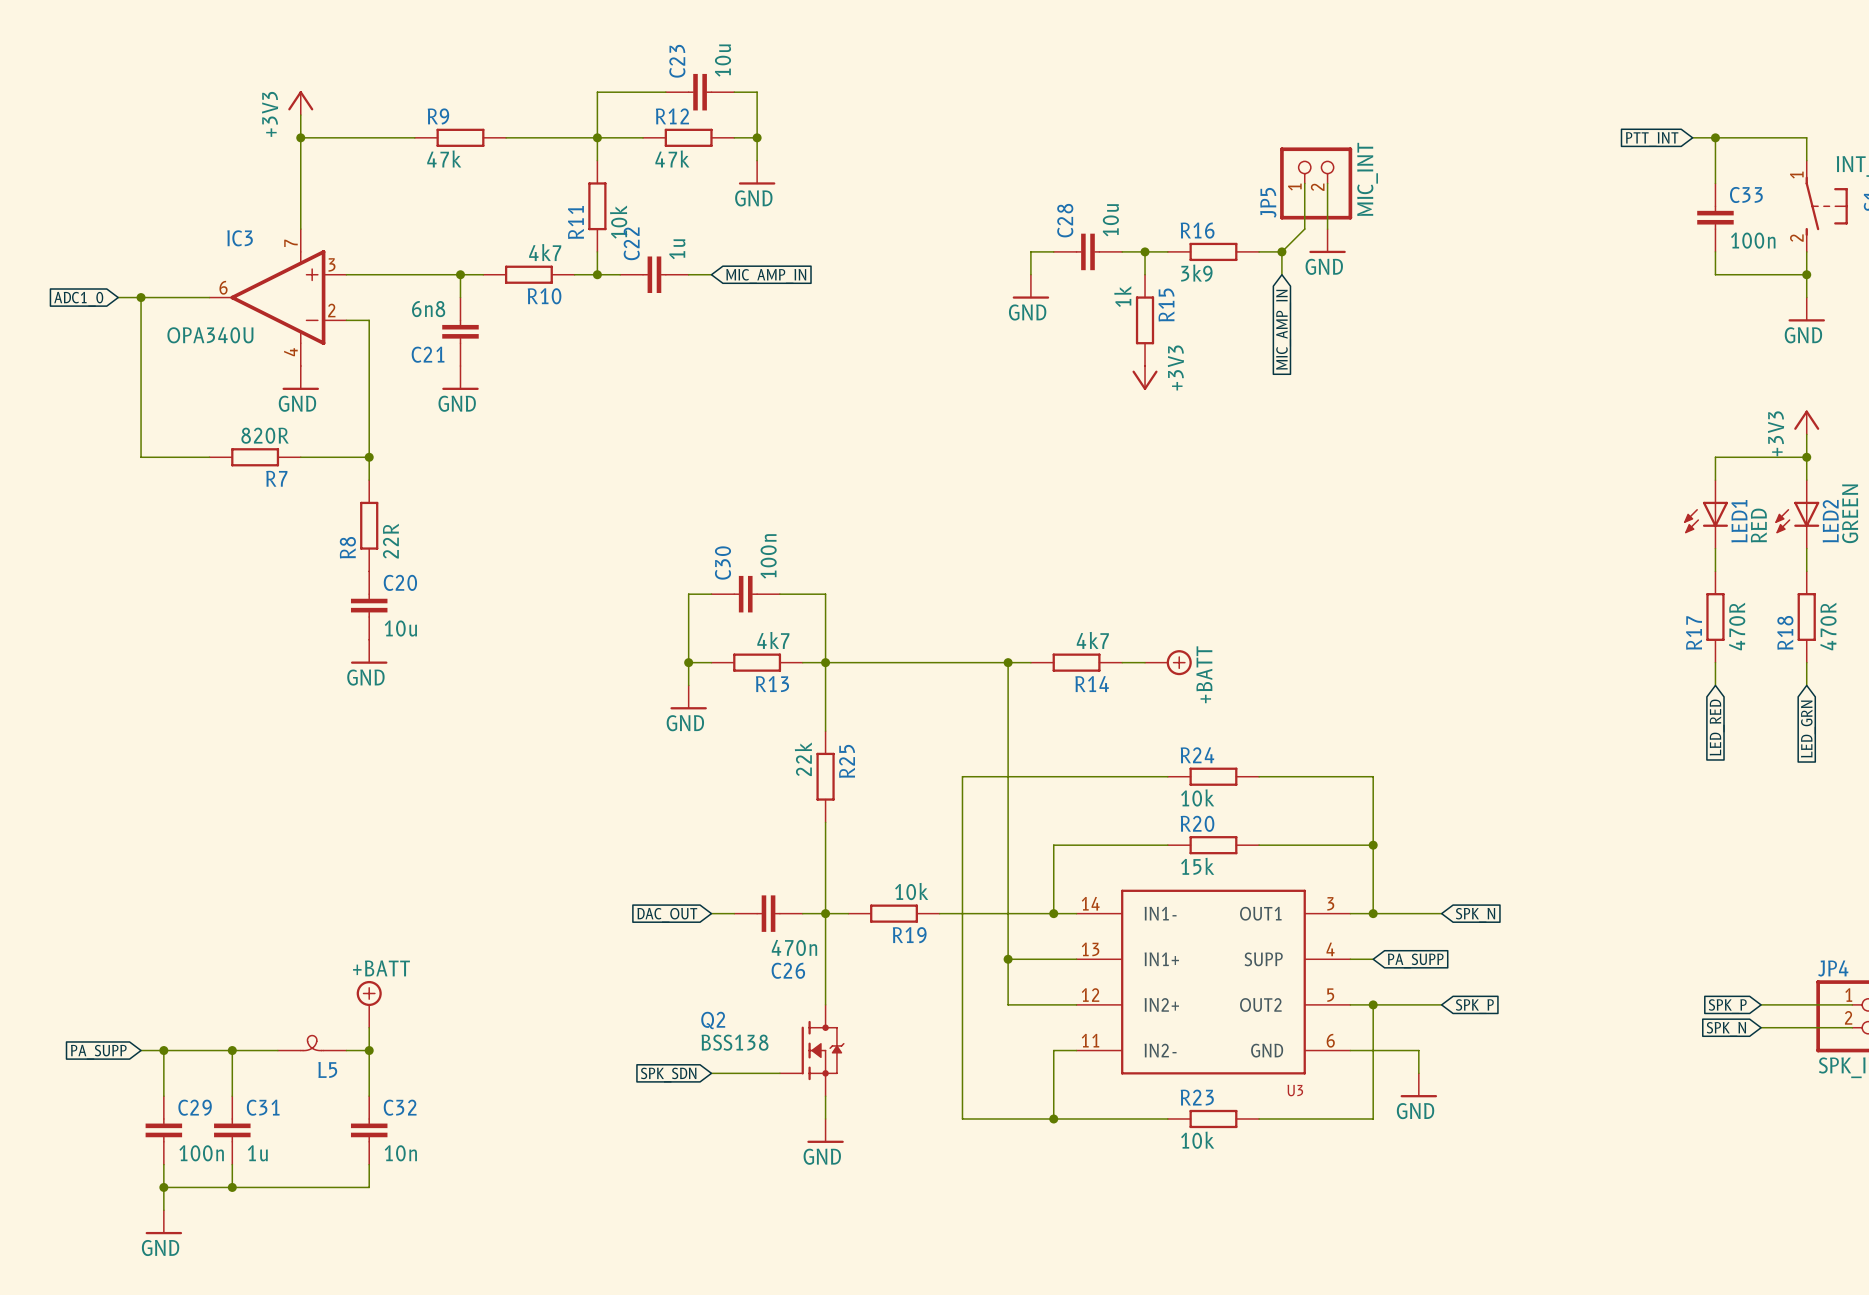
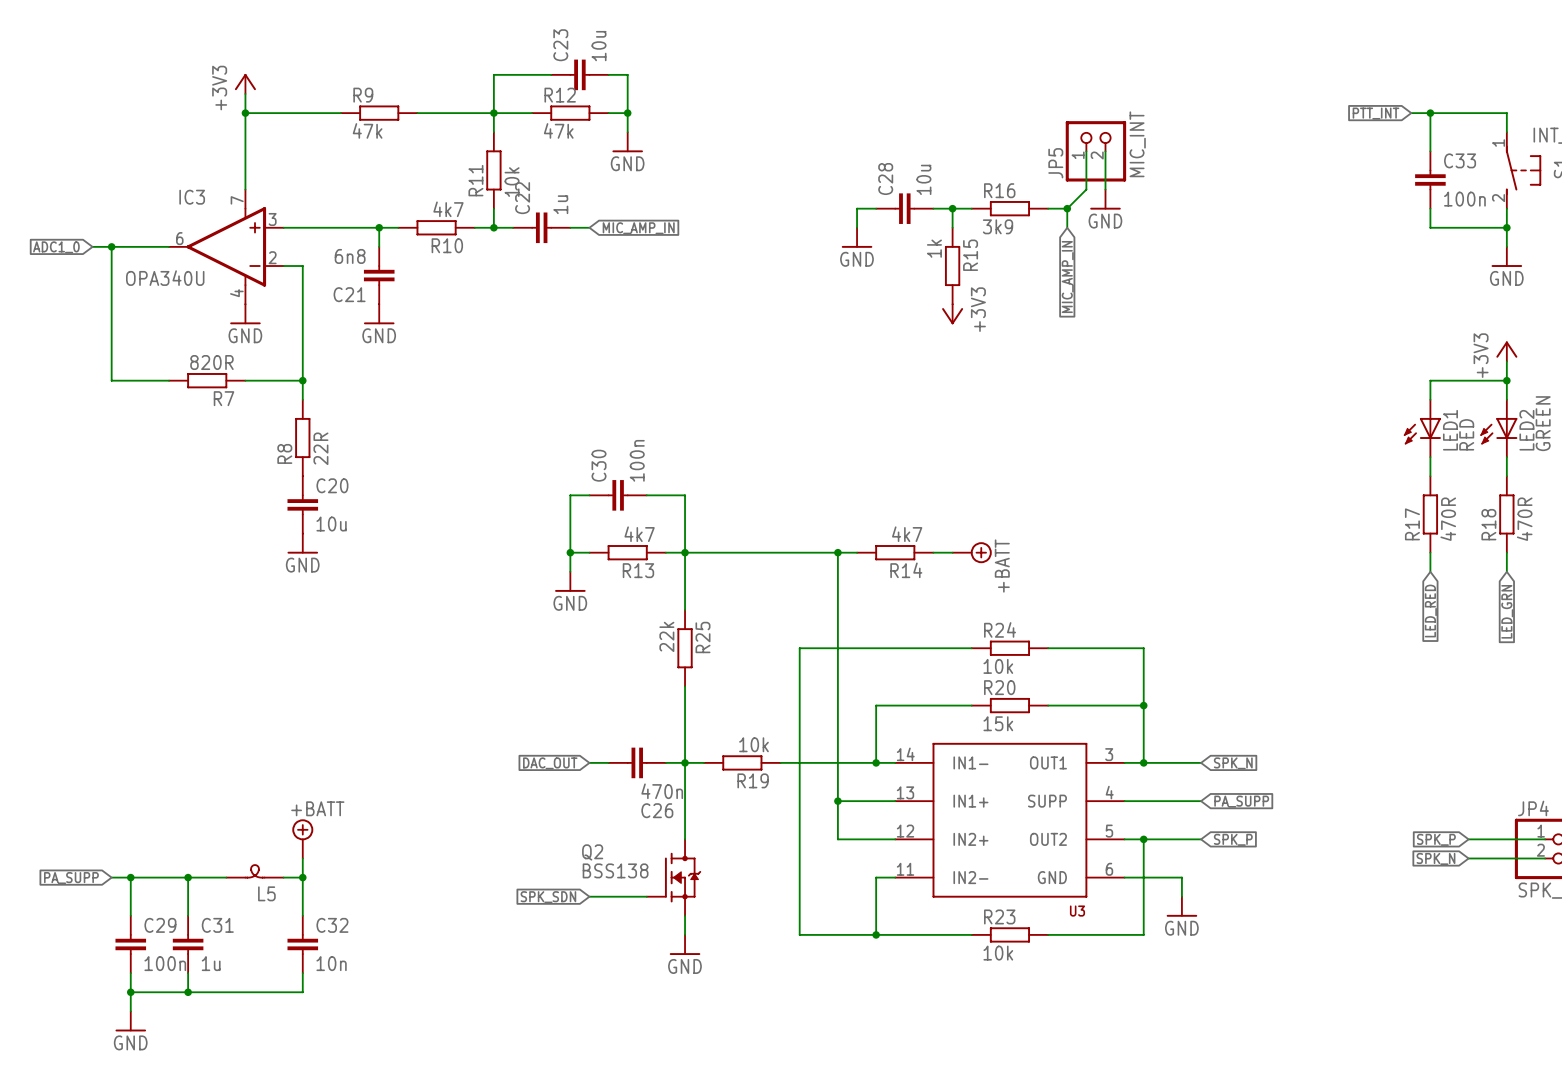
wire: none -> (1143, 801) (1201, 801)
global label position: PA_SUPP (1415, 960) -> PA_SUPP (1241, 801)

